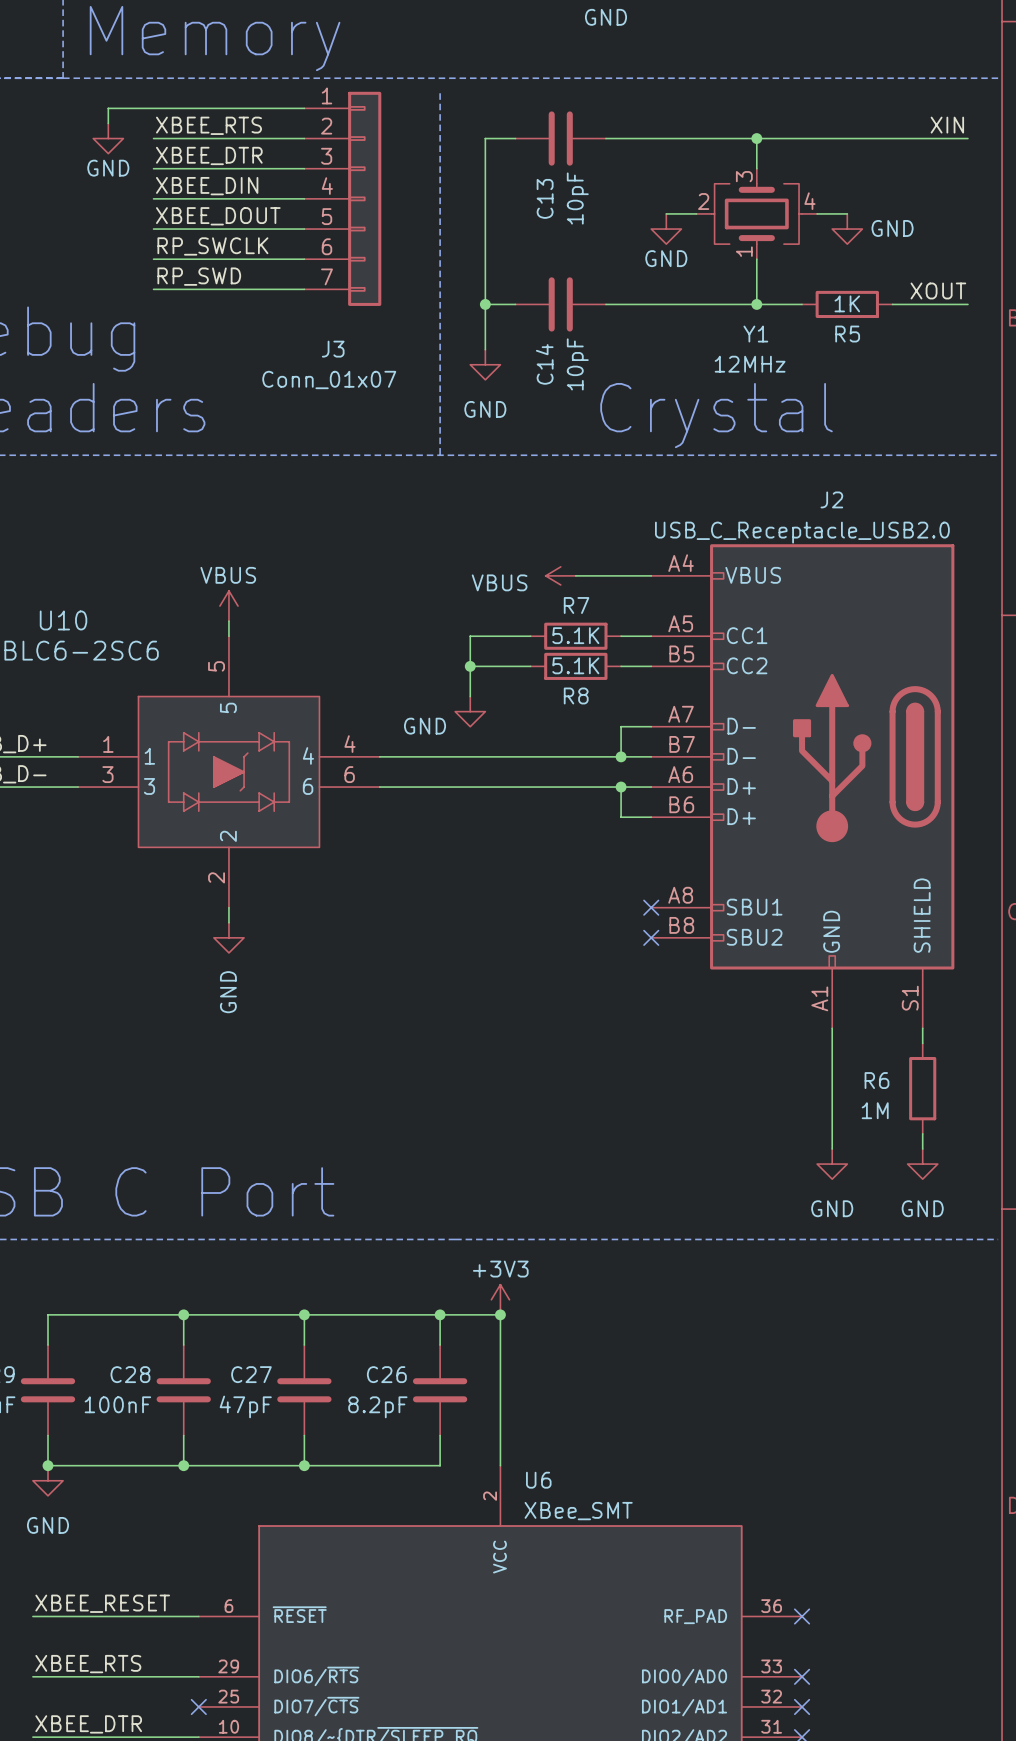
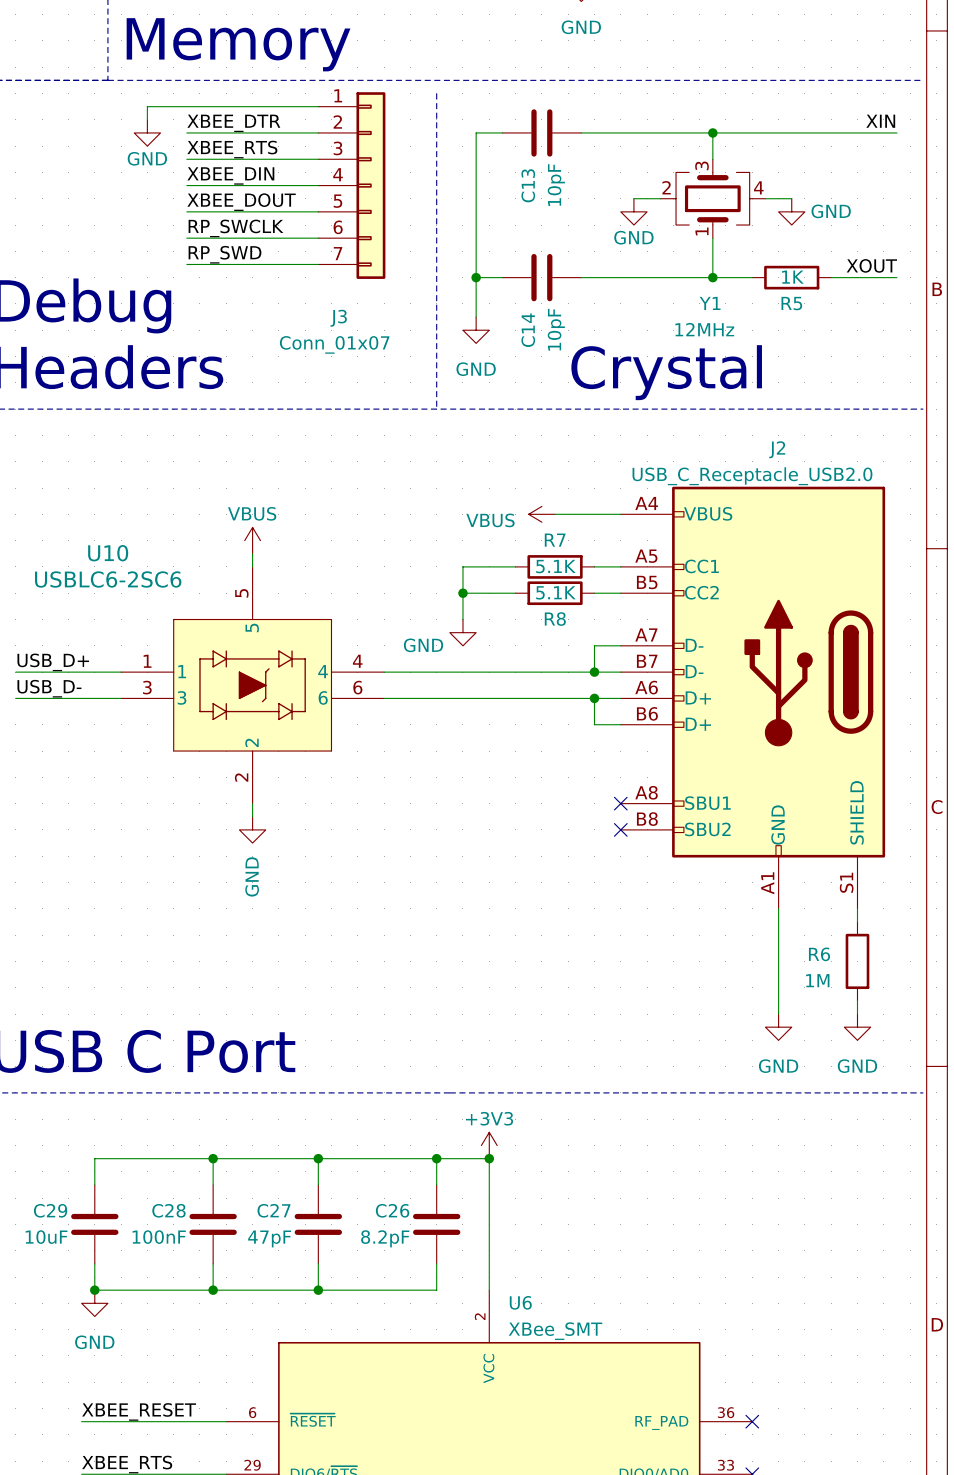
label: XBEE_RTS (208, 125) -> XBEE_DTR (233, 123)
label: XBEE_DTR (209, 155) -> XBEE_RTS (232, 149)

